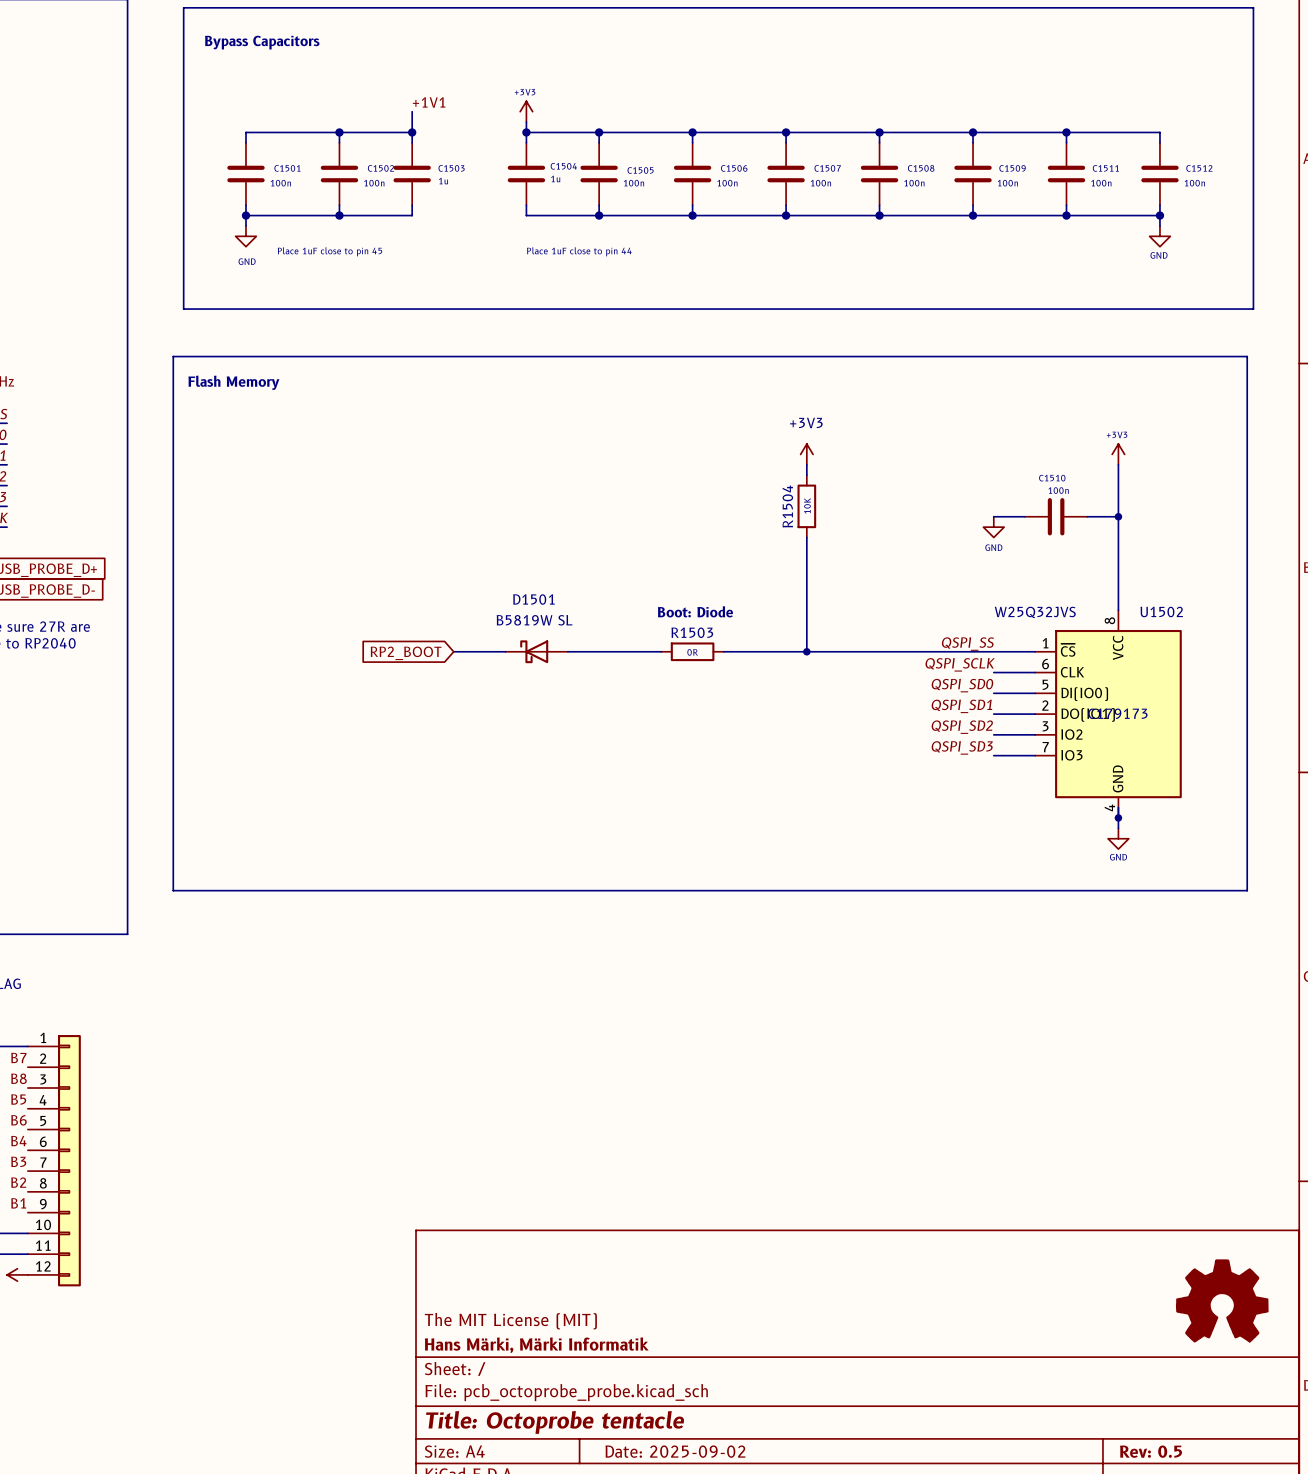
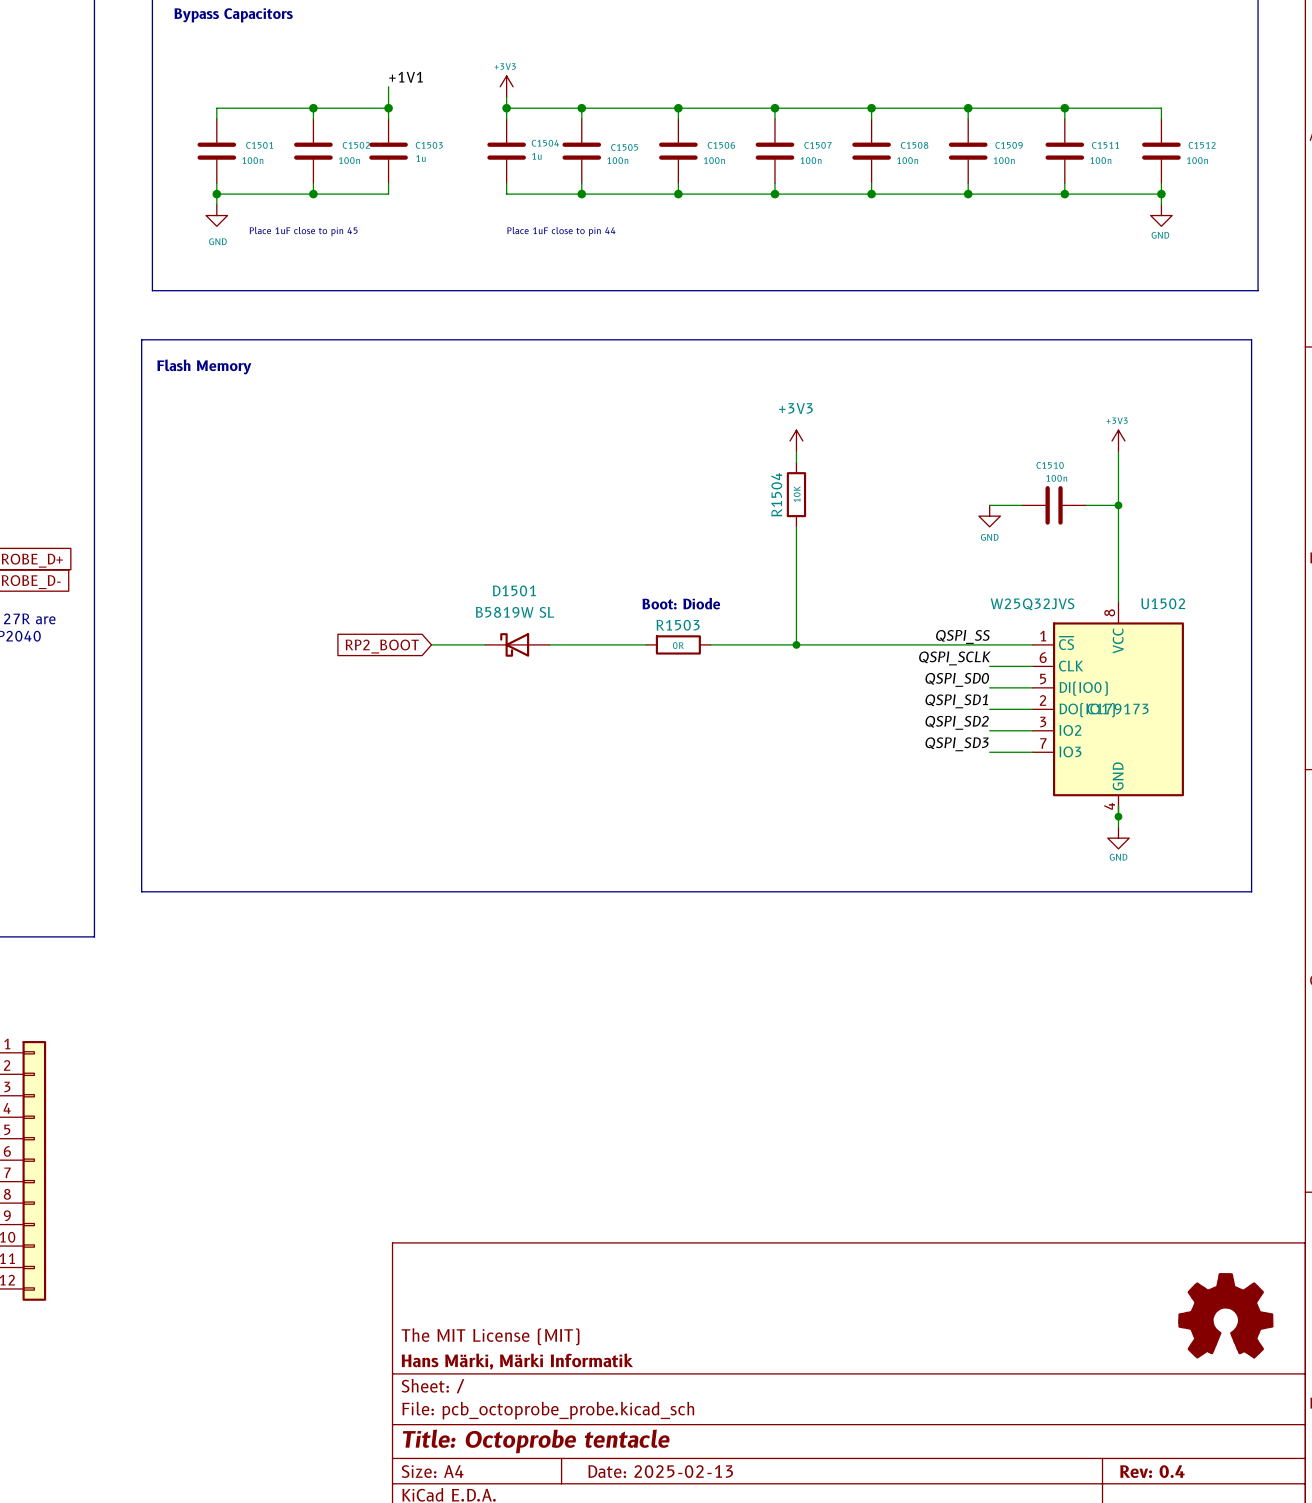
title block: Date: 2025-09-02 (675, 1451) -> Date: 2025-02-13 (660, 1471)
title block: Rev: 0.5 (1150, 1451) -> Rev: 0.4 (1152, 1471)

